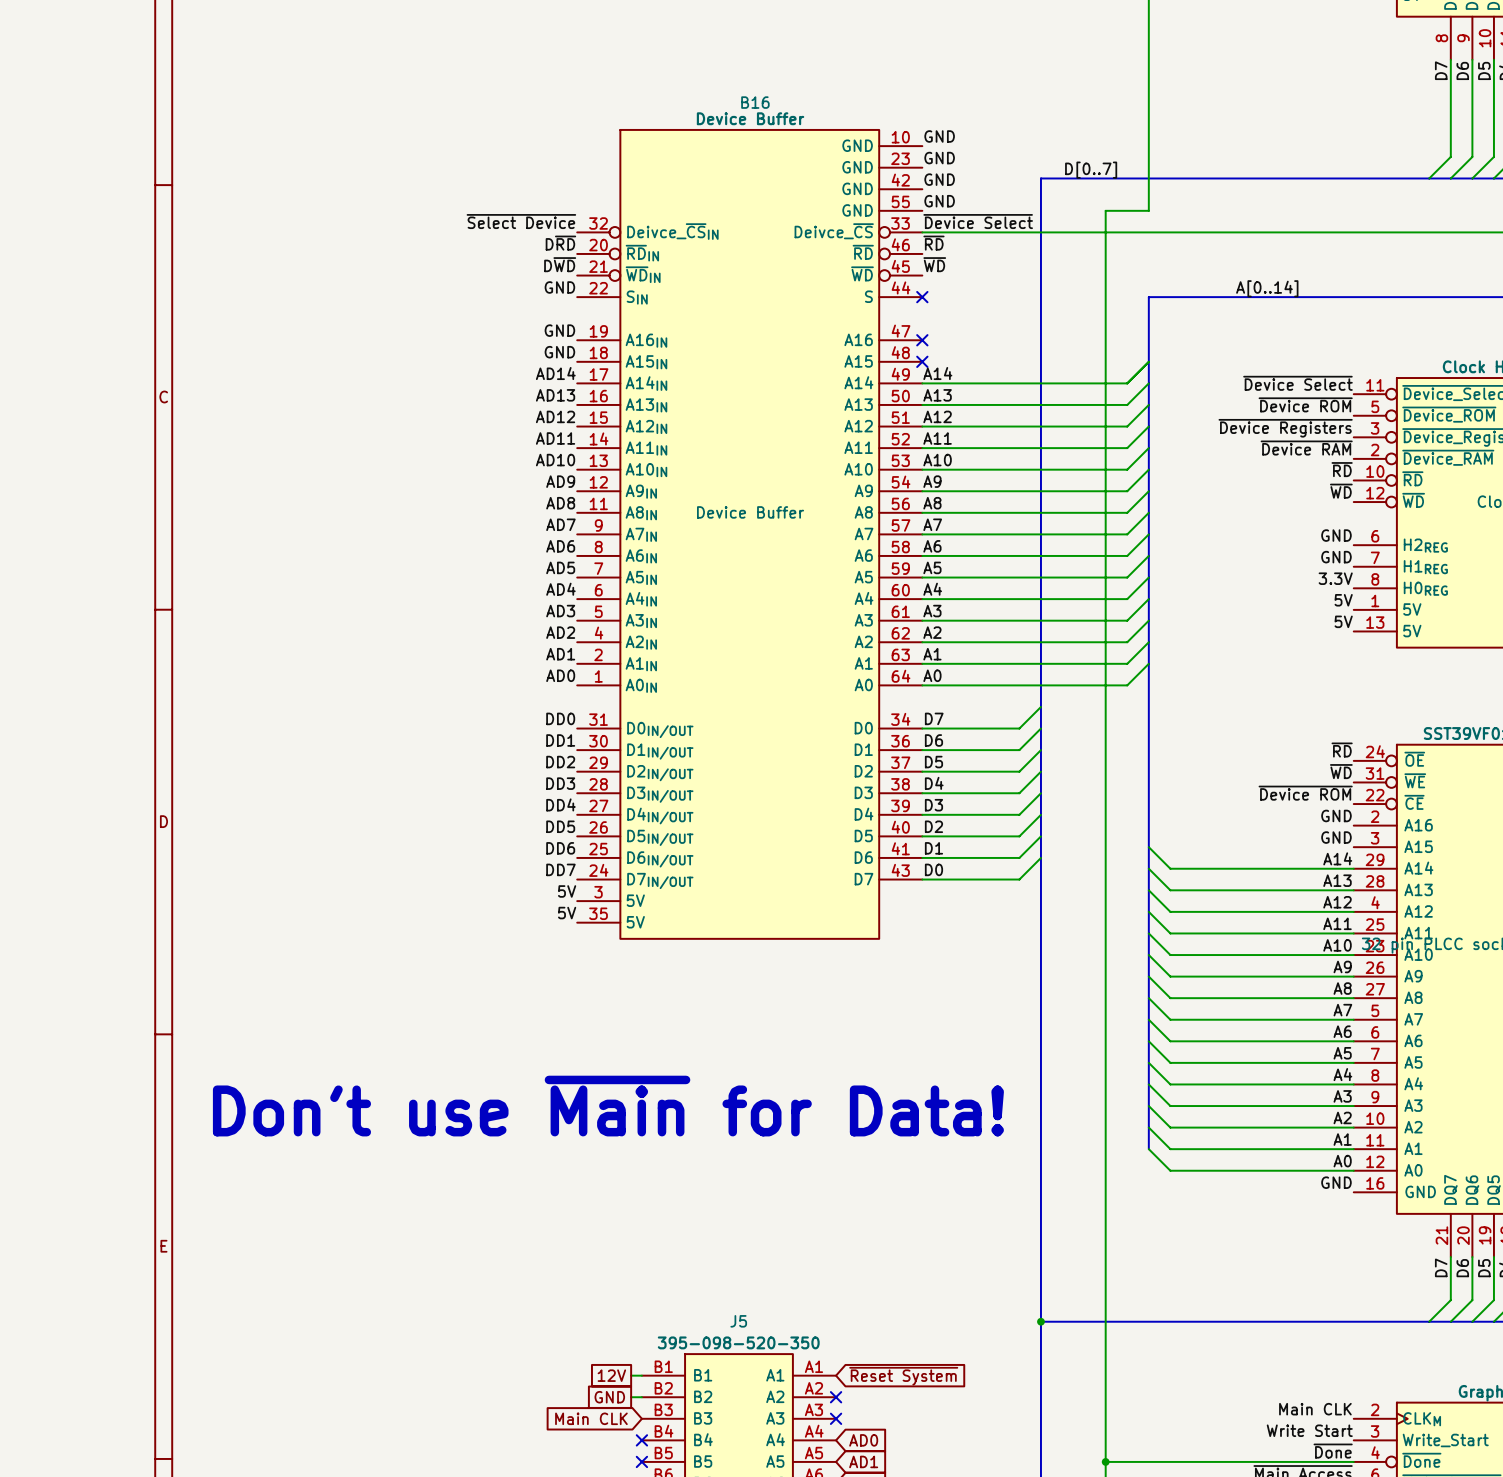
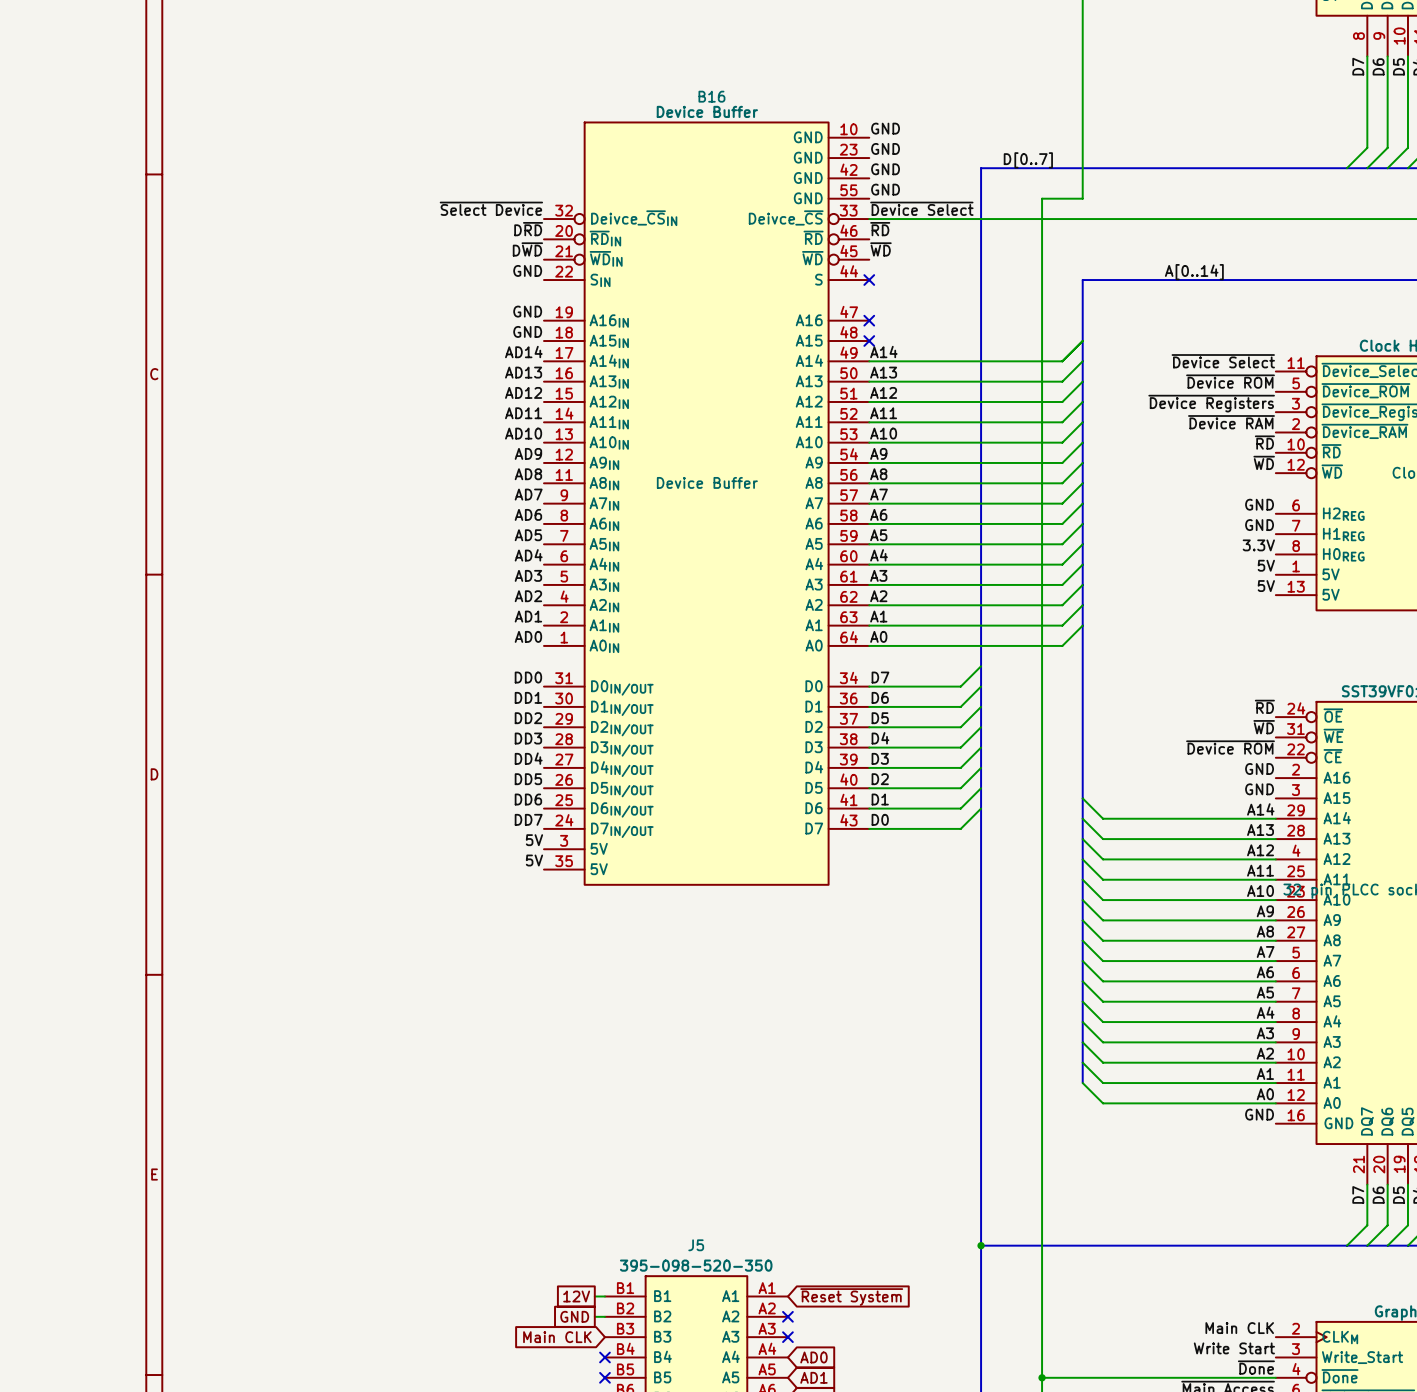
text: Don't use ~{Main} for Data! (608, 1106) -> none

